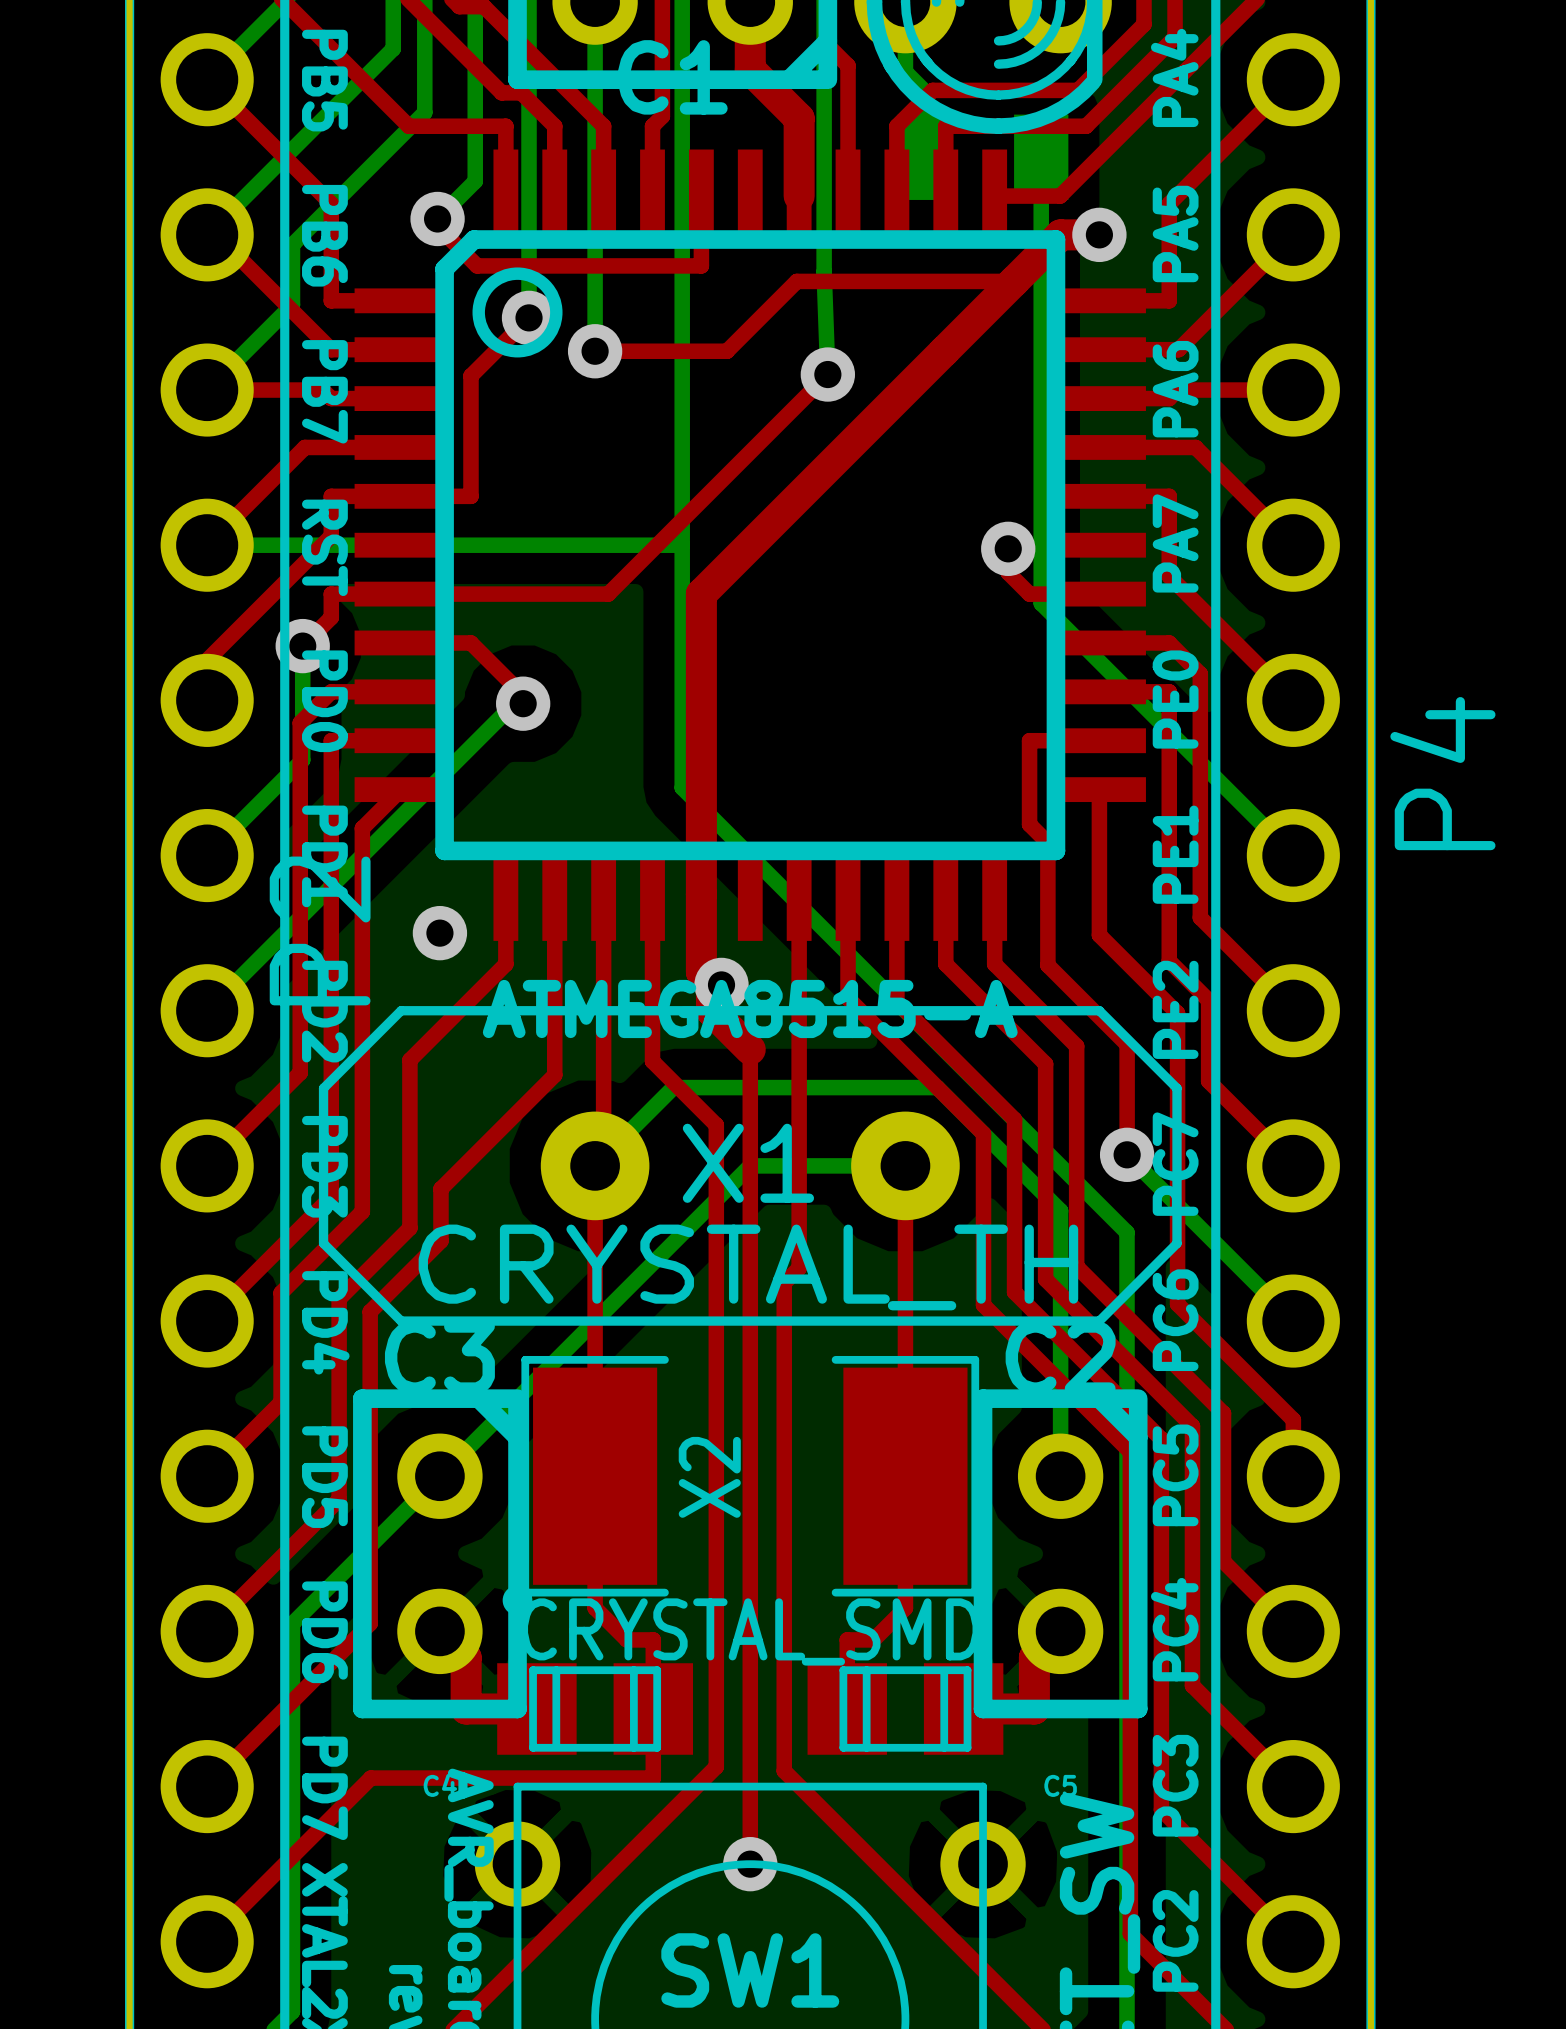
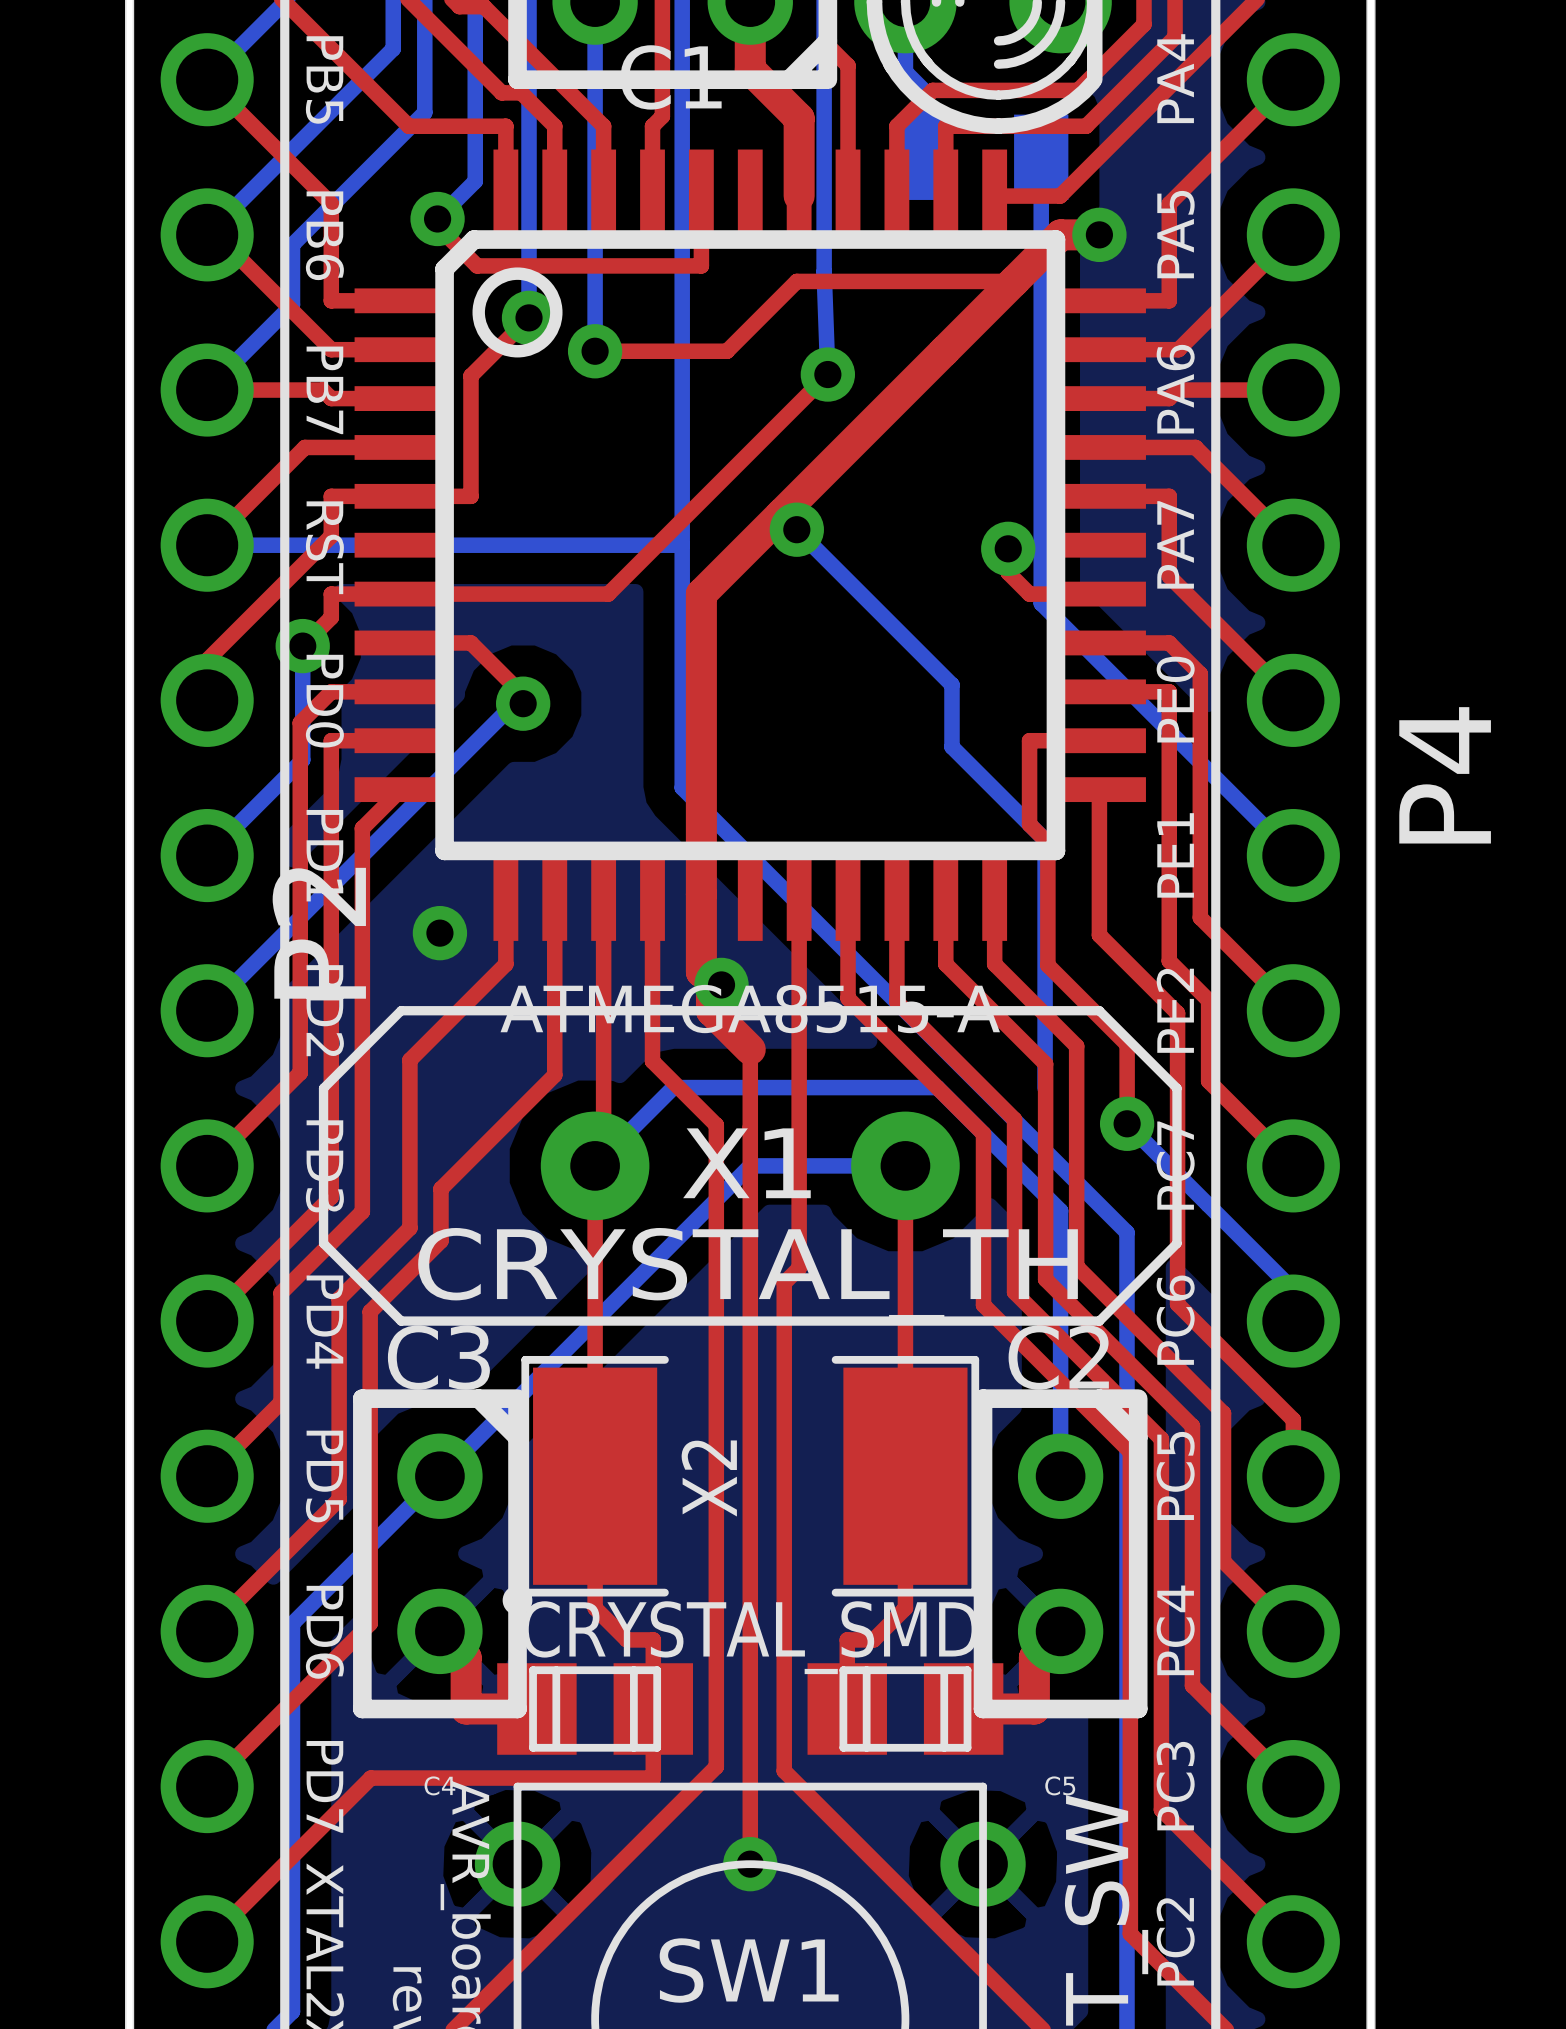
bottom track: none -> (796, 529) (951, 684) (951, 746) (1045, 840) (1045, 1088)
via: none -> (796, 529)
bottom track: (1127, 1154) (1293, 1321) -> (1127, 1123) (1293, 1290)
via position: (1127, 1154) -> (1127, 1123)

